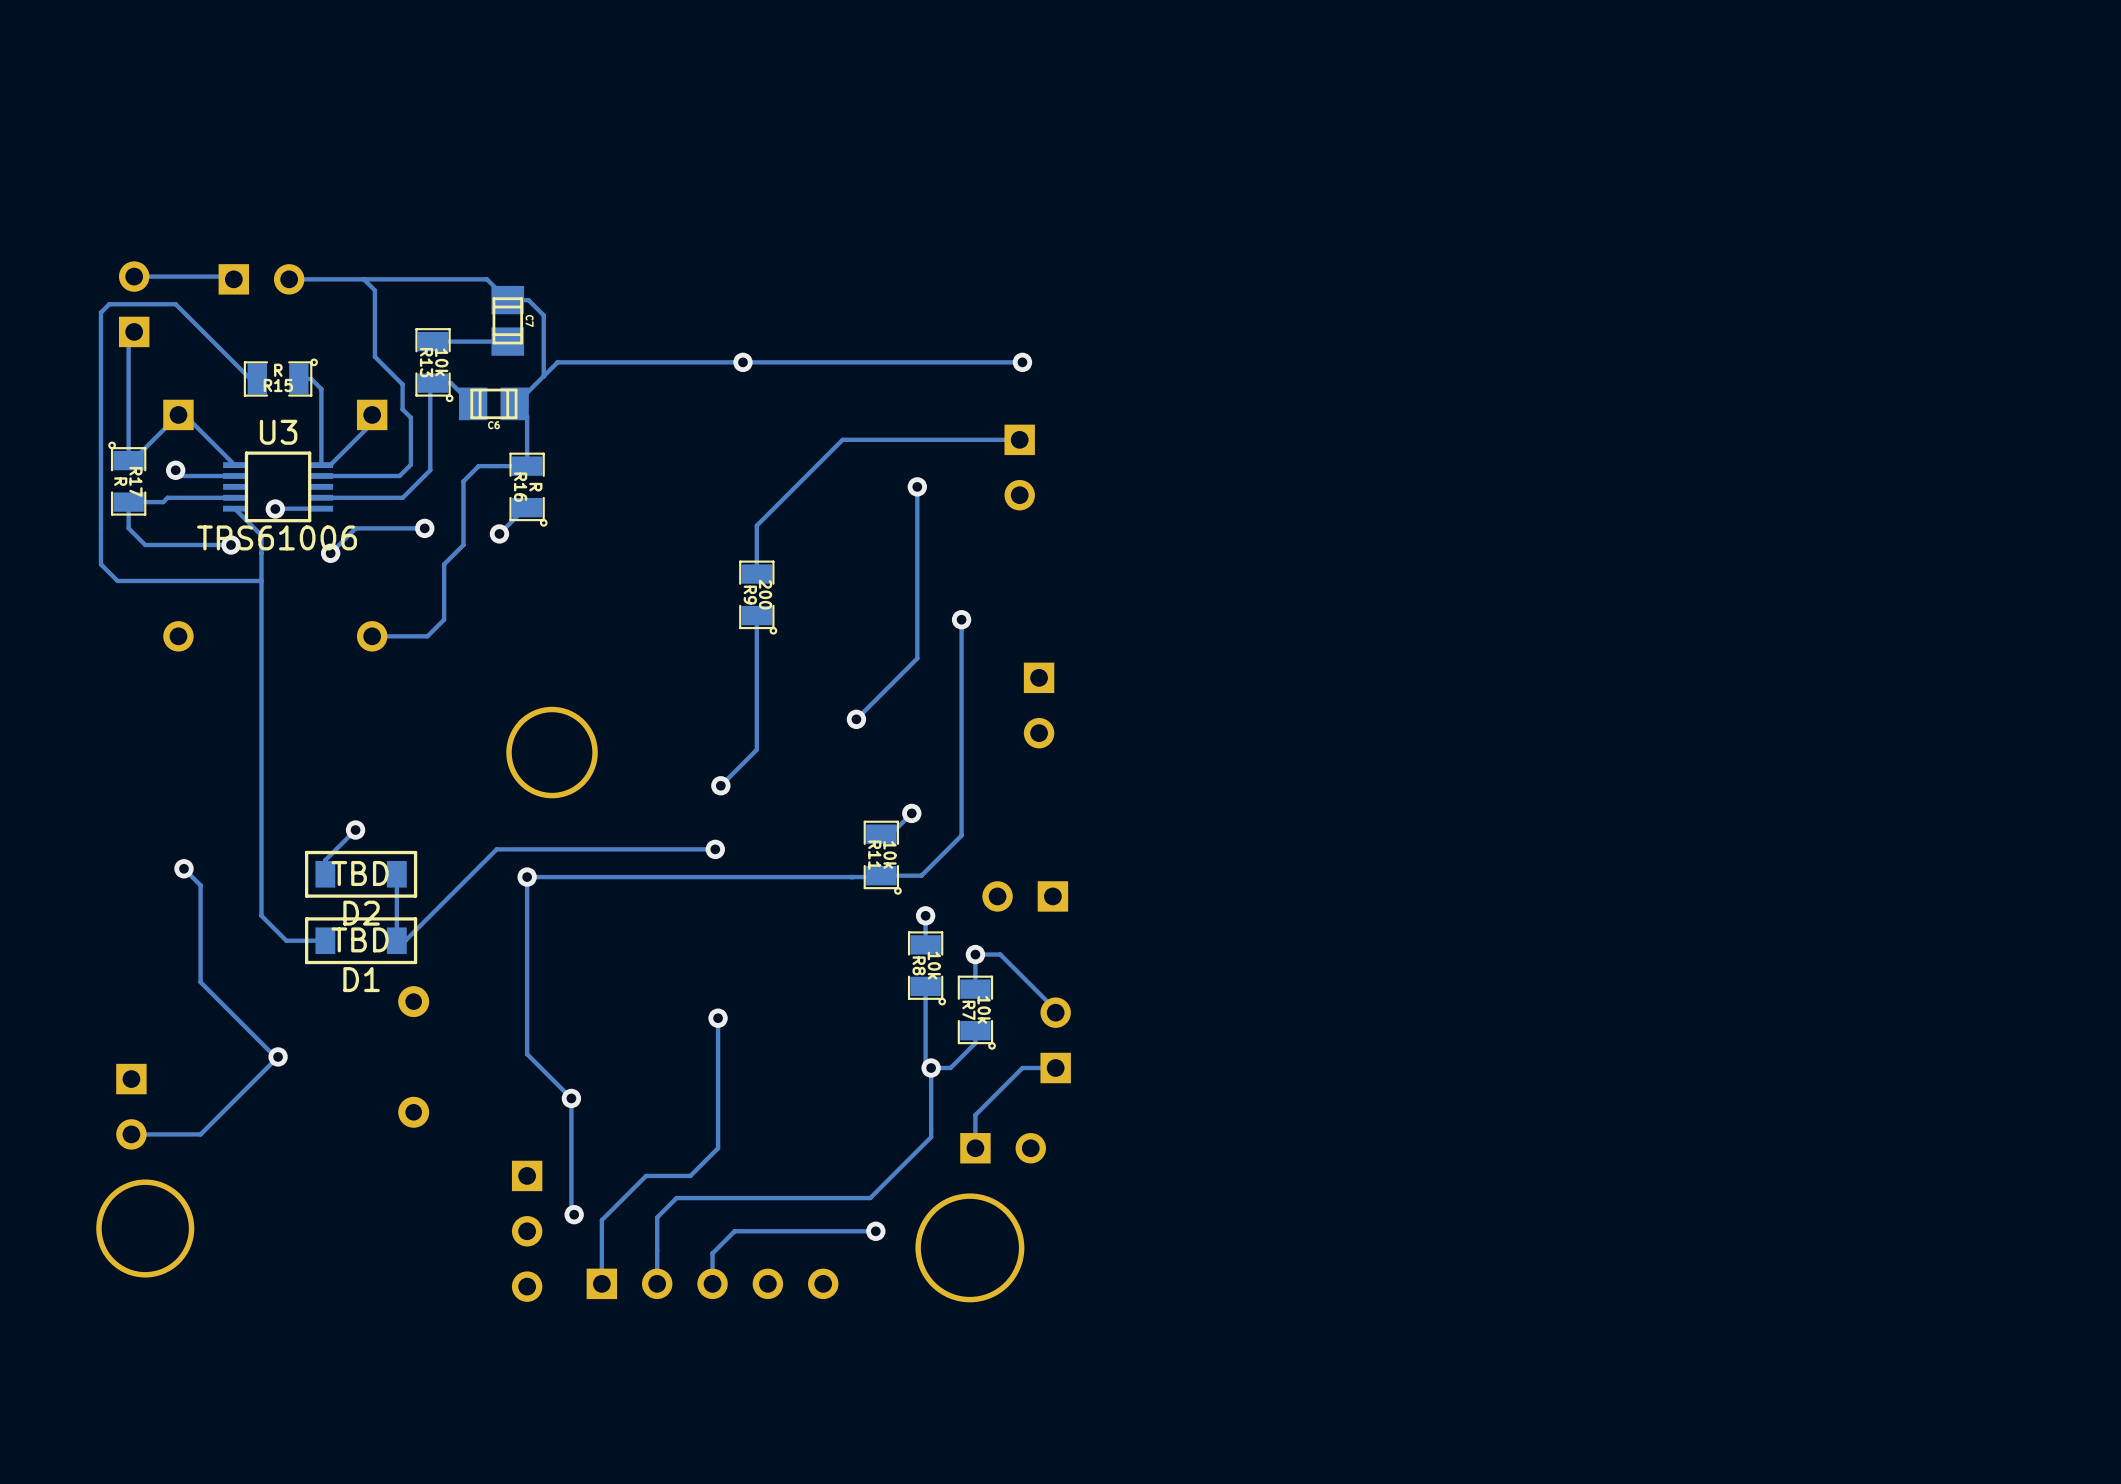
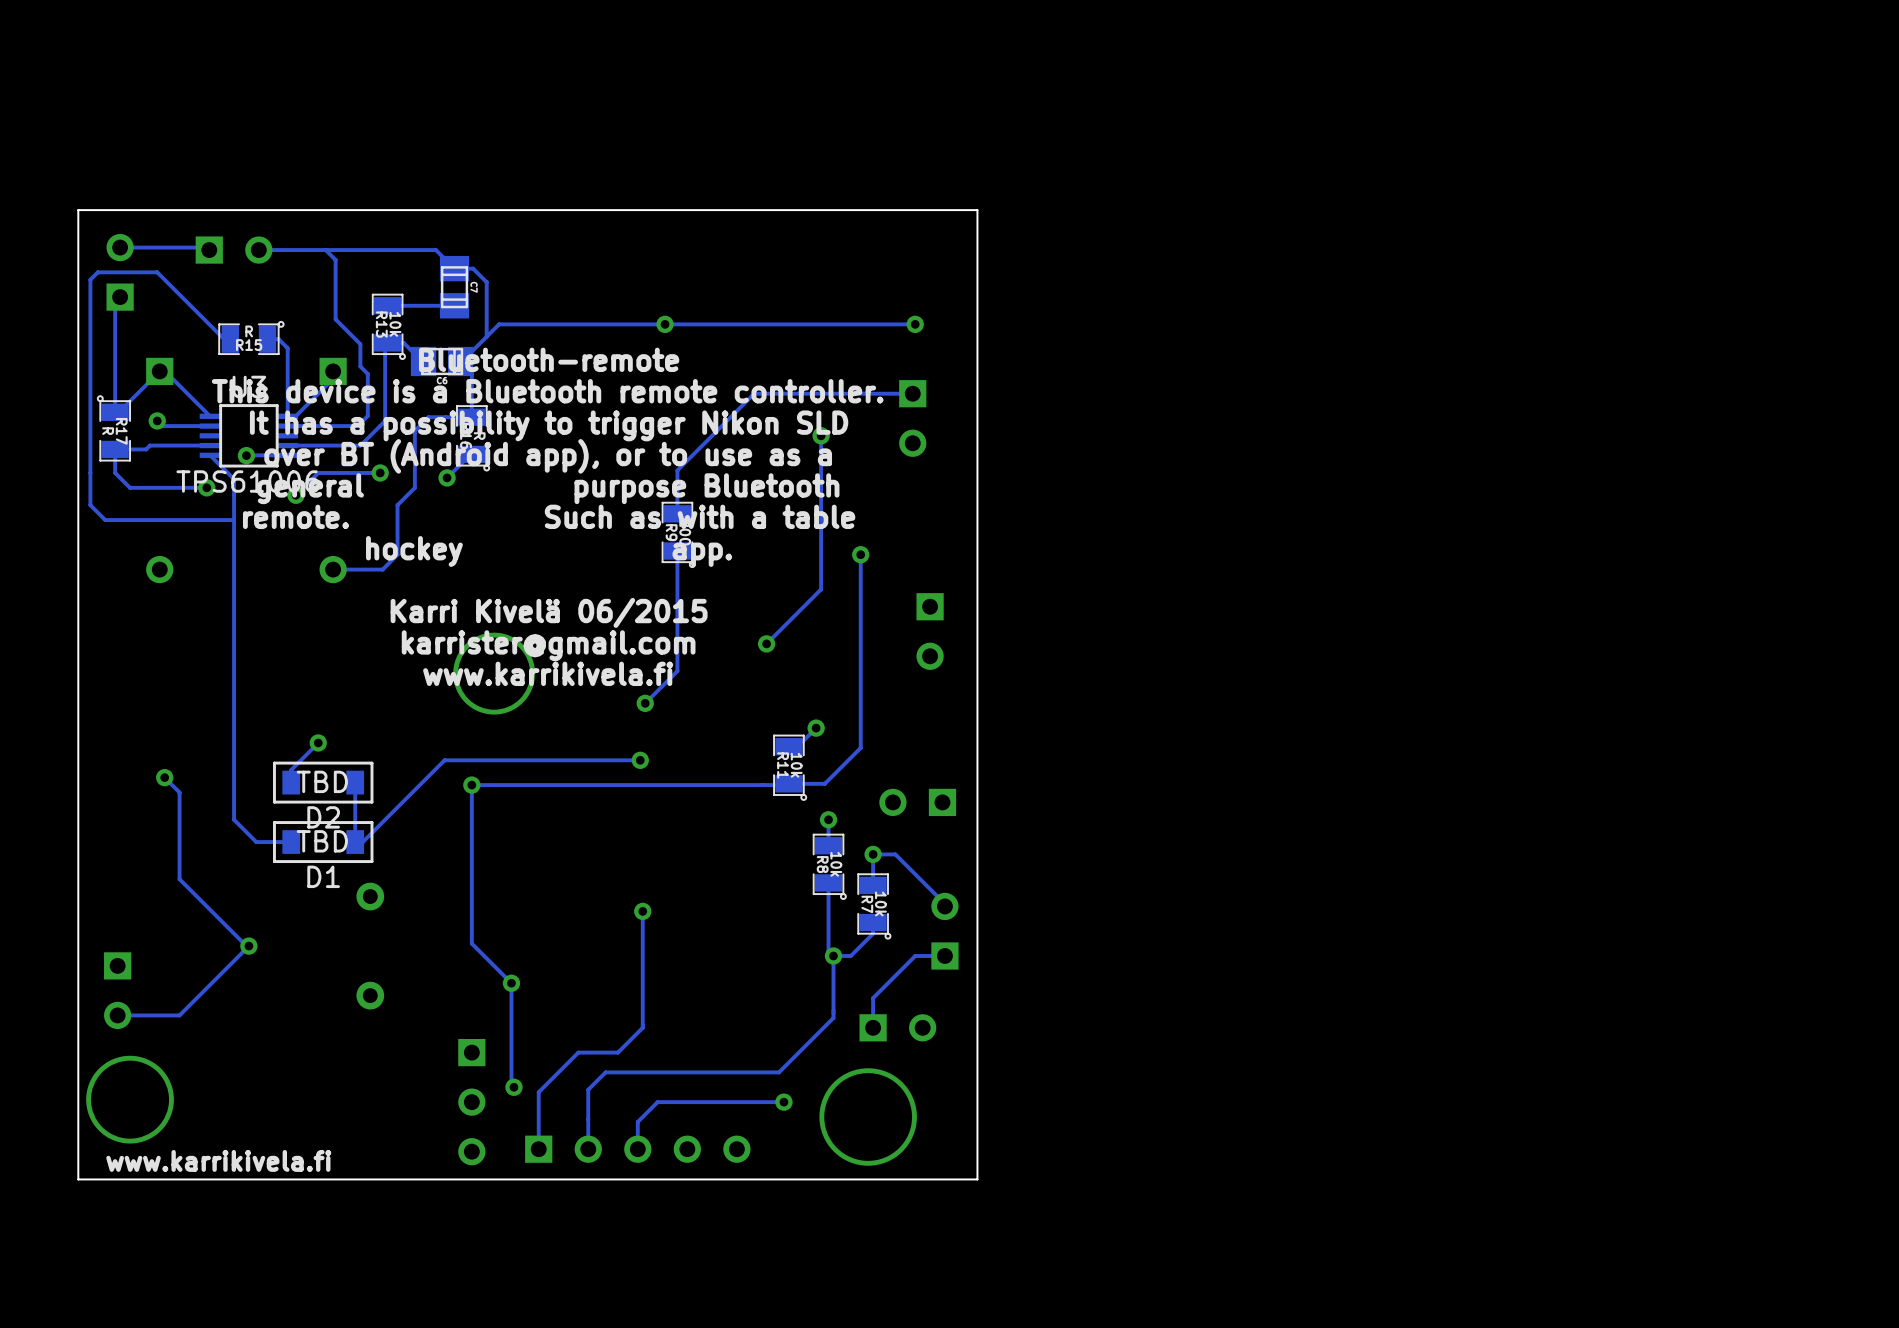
board edge: none -> (977, 210) (78, 210) (78, 1179) (977, 1179) (977, 210)
text: none -> Bluetooth-remote (549, 359)
text: none -> This device is a Bluetooth remote controller. (547, 391)
text: none -> It has a possibility to trigger Nikon SLD (549, 425)
text: none -> over BT (Android app), or to use as a (548, 456)
text: none -> general purpose Bluetooth (548, 488)
text: none -> remote. Such as with a table (549, 516)
text: none -> hockey app. (549, 551)
text: none -> Karri Kivelä 06/2015 (549, 612)
text: none -> karrister@gmail.com (548, 645)
text: none -> www.karrikivela.fi (548, 673)
text: none -> www.karrikivela.fi (218, 1160)

